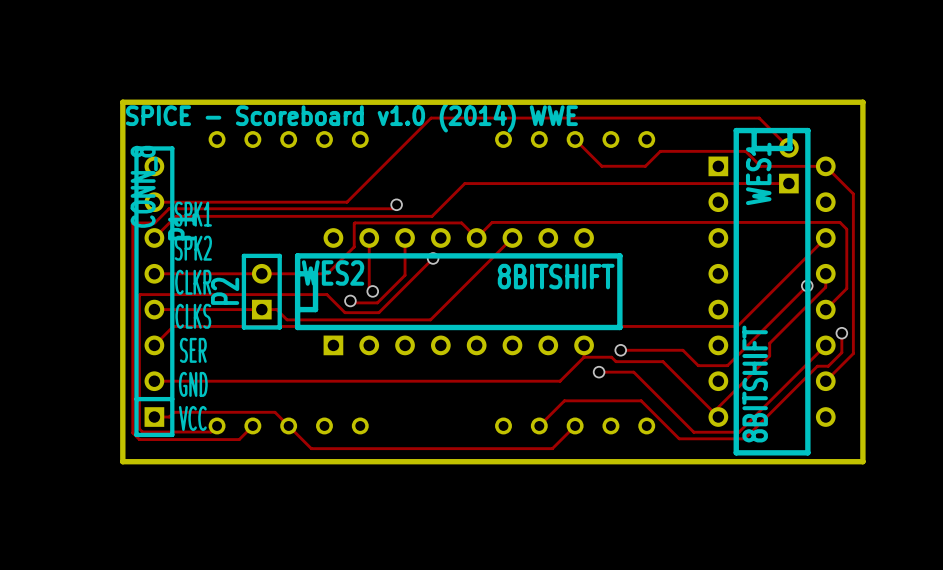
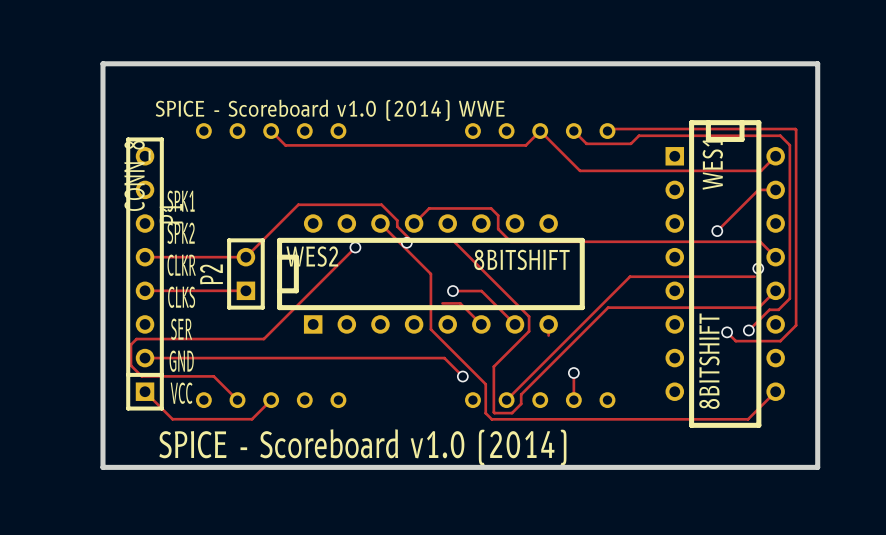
board edge: (122, 102) (862, 102) (862, 461) (122, 461) (122, 102) -> (102, 63) (102, 467) (817, 467) (817, 63) (102, 63)
track: none -> (271, 131) (285, 145) (525, 145) (540, 131)
track: none -> (573, 131) (586, 143) (630, 143) (639, 135) (780, 135) (789, 145) (789, 298) (778, 309) (769, 309) (748, 330)
track: none -> (607, 131) (609, 129) (796, 129) (796, 325) (780, 341) (735, 341) (727, 332)
track: (788, 147) (759, 118) (431, 118) (347, 202) (154, 202) -> none
part: (788, 165) -> none
track: (601, 166) (645, 166) (660, 151) (745, 151) (760, 166) (825, 166) (853, 193) (853, 353) (825, 381) -> (565, 156) (580, 170) (761, 170) (775, 156)
track: (788, 183) (464, 183) (432, 216) (176, 216) (154, 237) -> none
track: none -> (775, 189) (758, 189) (717, 231)
track: (396, 204) (392, 208) (169, 208) (154, 222) (132, 223) (132, 432) (139, 439) (239, 439) (252, 425) -> none
via: (396, 204) -> none
track: (369, 237) (369, 287) (372, 291) -> none
track: (405, 237) (405, 275) (377, 302) (352, 302) (350, 300) -> (380, 223) (430, 273) (430, 329) (485, 384) (485, 413) (491, 419) (748, 419) (775, 391)
track: (512, 237) (430, 319) (287, 319) (276, 309) (261, 309) -> none
track: (825, 237) (737, 326) (173, 326) (154, 345) -> none
via: none -> (717, 231)
track: (433, 258) (378, 312) (344, 312) (326, 294) (140, 294) (139, 366) -> (355, 247) (263, 339) (136, 339) (130, 344)
via: none -> (355, 247)
track: (261, 273) (327, 273) (354, 246) (355, 222) (461, 222) (476, 237) (492, 222) (839, 222) (846, 229) (846, 288) (825, 309) -> (245, 257) (298, 204) (381, 204) (397, 220) (397, 226) (411, 241) (453, 241) (529, 316) (529, 331) (493, 366) (494, 413) (512, 413) (521, 403) (521, 394) (608, 307) (758, 307) (775, 290)
track: (825, 273) (825, 287) (769, 343) (769, 356) (713, 412) -> (775, 257) (760, 241) (510, 241) (498, 229) (498, 215) (491, 208) (429, 208) (414, 223)
track: (807, 285) (727, 365) (698, 365) (682, 350) (620, 350) -> none
via: (372, 291) -> none
via: (350, 300) -> none
track: none -> (452, 291) (481, 291) (515, 324)
via: none -> (452, 291)
track: none -> (442, 303) (460, 303) (481, 324)
track: (841, 333) (841, 352) (828, 366) (817, 366) (744, 438) (679, 438) (641, 400) (564, 400) -> (754, 276) (630, 276) (530, 376)
via: (841, 333) -> none
track: (825, 345) (738, 432) (693, 432) (633, 372) (599, 372) -> none
via: (620, 350) -> none
via: none -> (748, 330)
via: none -> (727, 332)
via: (599, 372) -> none
track: (473, 381) (560, 381) (584, 357) (611, 357) (616, 361) (662, 361) (718, 417) -> (444, 358) (462, 376)
track: (139, 389) (139, 428) (142, 432) (211, 432) (217, 425) -> (130, 365) (141, 376) (213, 376) (237, 400)
track: none -> (573, 373) (573, 400)
via: none -> (573, 373)
via: none -> (462, 376)
track: (154, 417) (169, 417) (174, 412) (274, 412) (311, 448) (552, 448) (575, 425) -> (145, 391) (172, 419) (252, 419) (271, 400)
text: none -> SPICE - Scoreboard v1.0 (2014) (362, 447)

